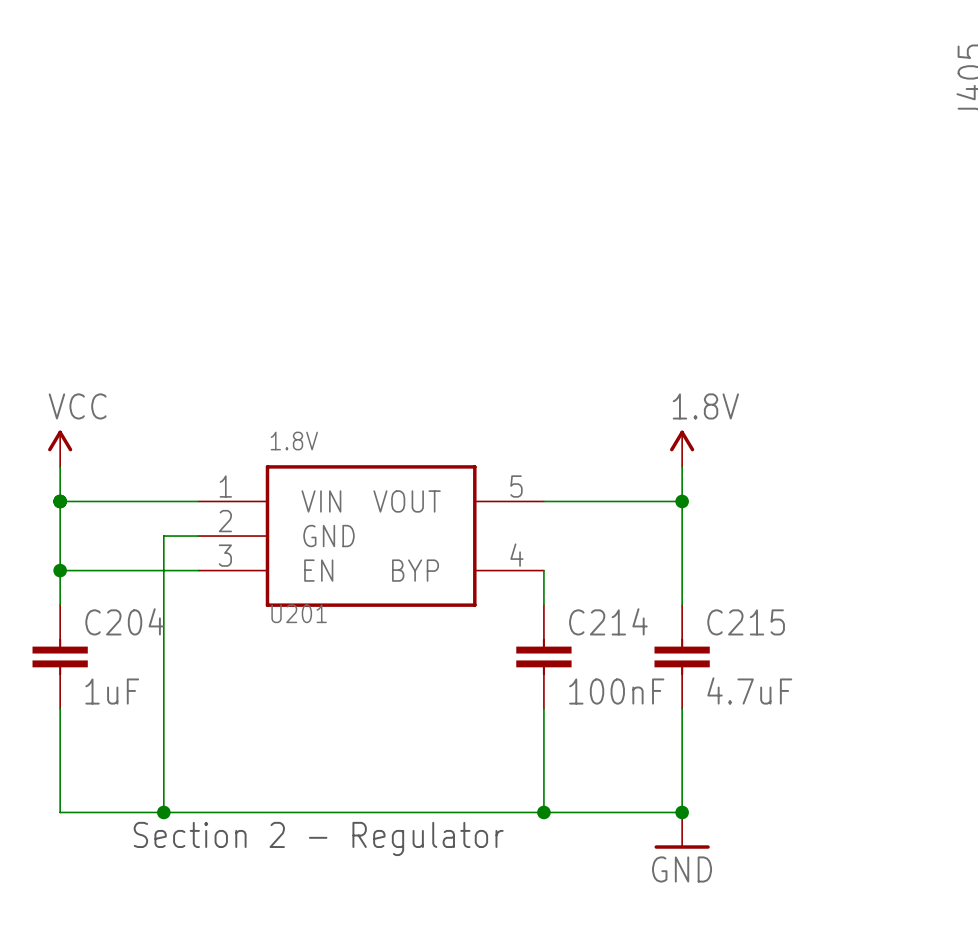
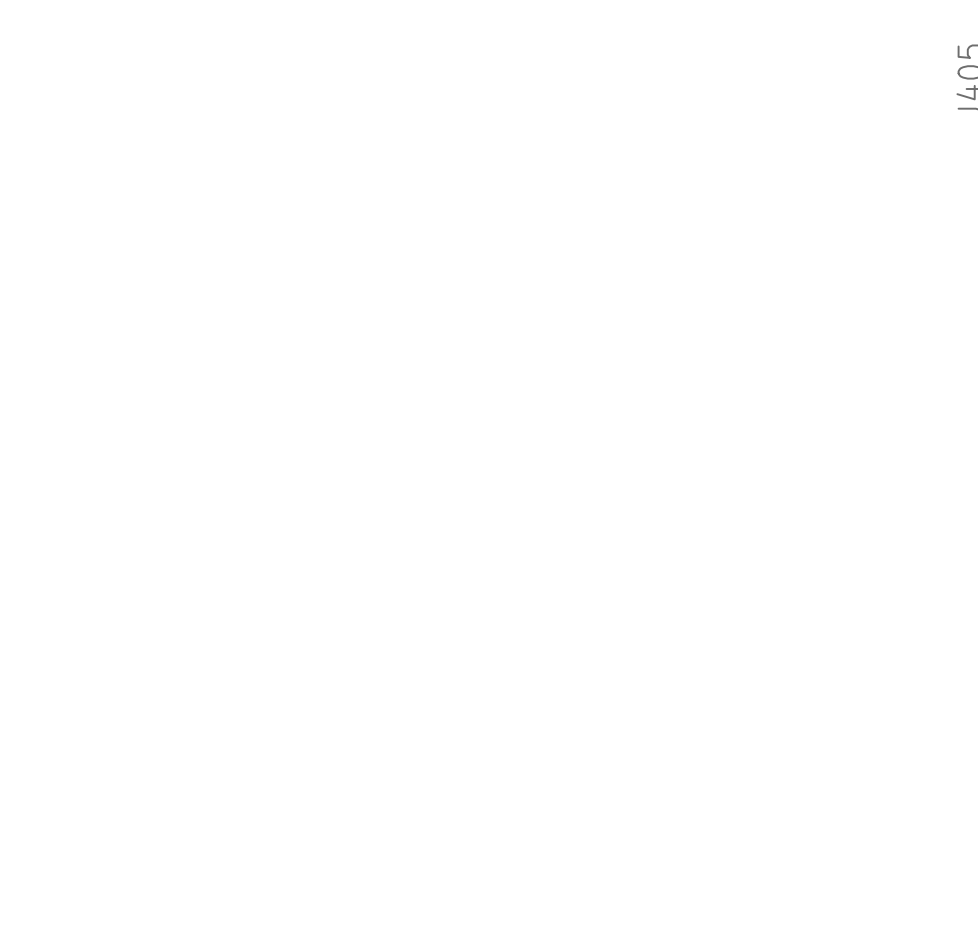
power symbol: VCC (60, 448) -> none
power symbol: 1.8V (682, 448) -> none
wire: (60, 466) (60, 605) -> none
wire: (682, 466) (682, 605) -> none
wire: (60, 501) (198, 501) -> none
junction: (60, 501) -> none
wire: (543, 501) (682, 501) -> none
junction: (682, 501) -> none
wire: (198, 536) (163, 536) (163, 812) -> none
U201: 1.8V (371, 536) -> none
wire: (60, 570) (198, 570) -> none
junction: (60, 570) -> none
wire: (543, 570) (543, 605) -> none
C204: 1uF (60, 656) -> none
C214: 100nF (543, 656) -> none
C215: 4.7uF (682, 656) -> none
wire: (60, 708) (60, 812) (682, 812) (682, 708) -> none
wire: (543, 708) (543, 812) -> none
junction: (163, 812) -> none
junction: (543, 812) -> none
junction: (682, 812) -> none
power symbol: GND (682, 830) -> none
text: Section 2 - Regulator (318, 838) -> none

